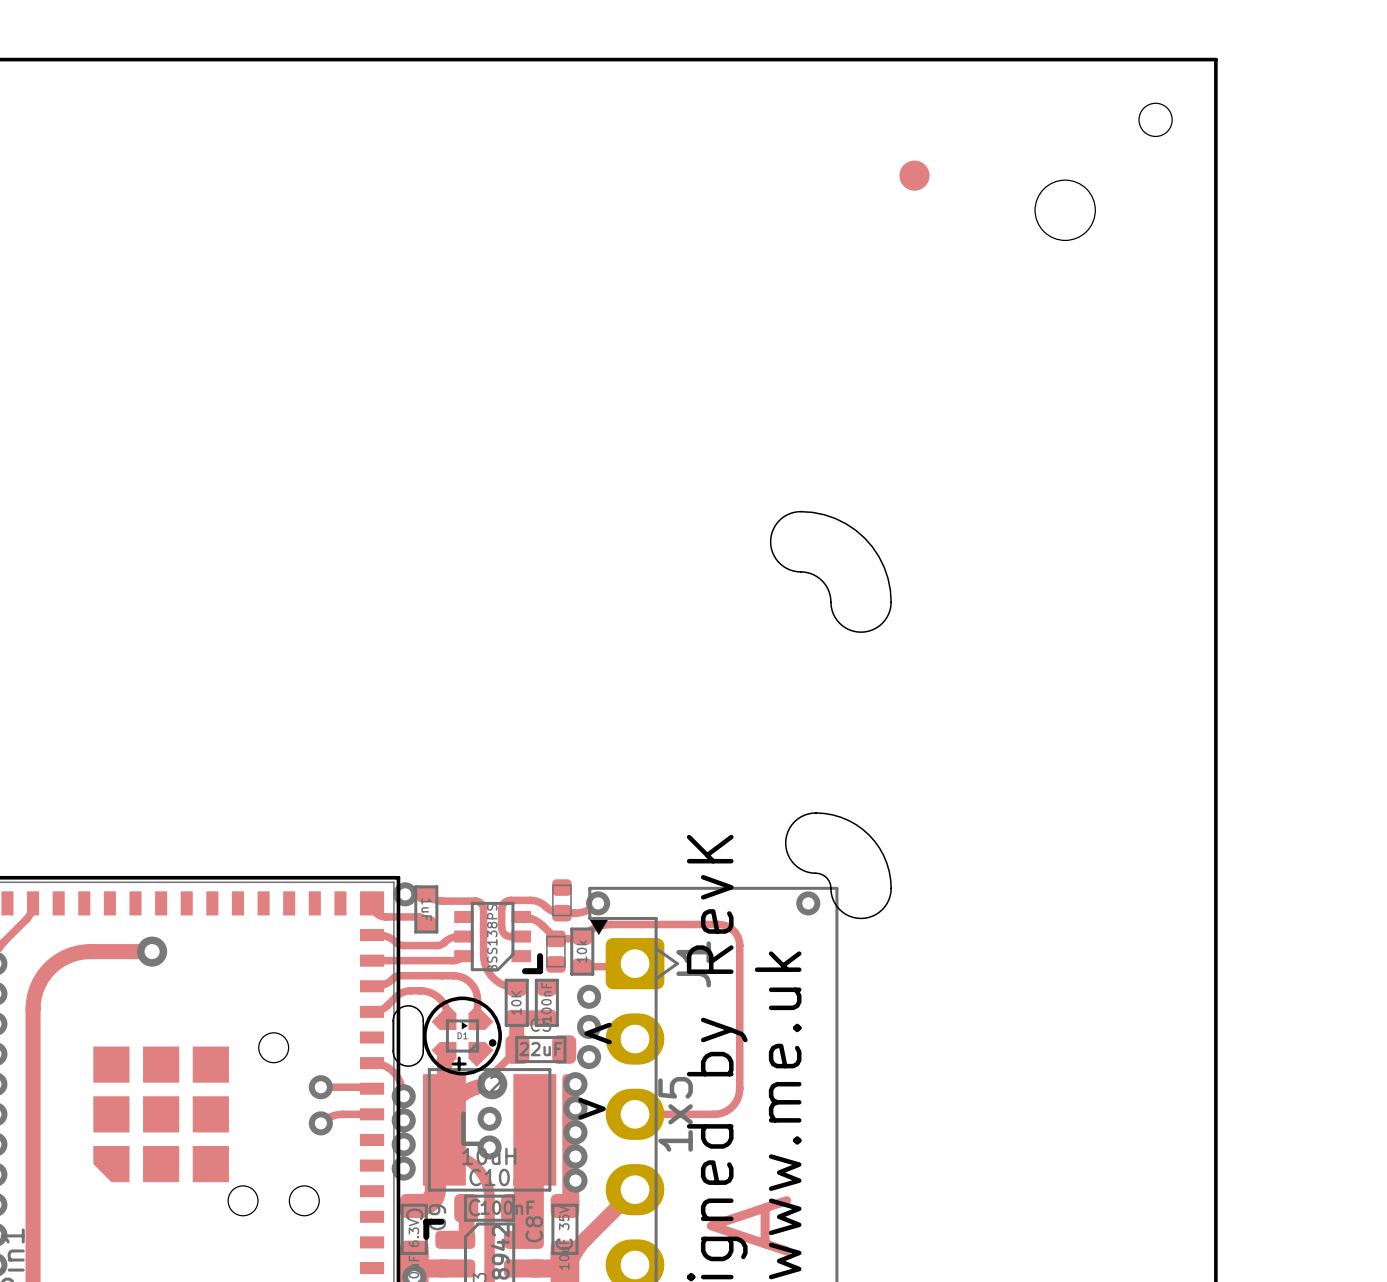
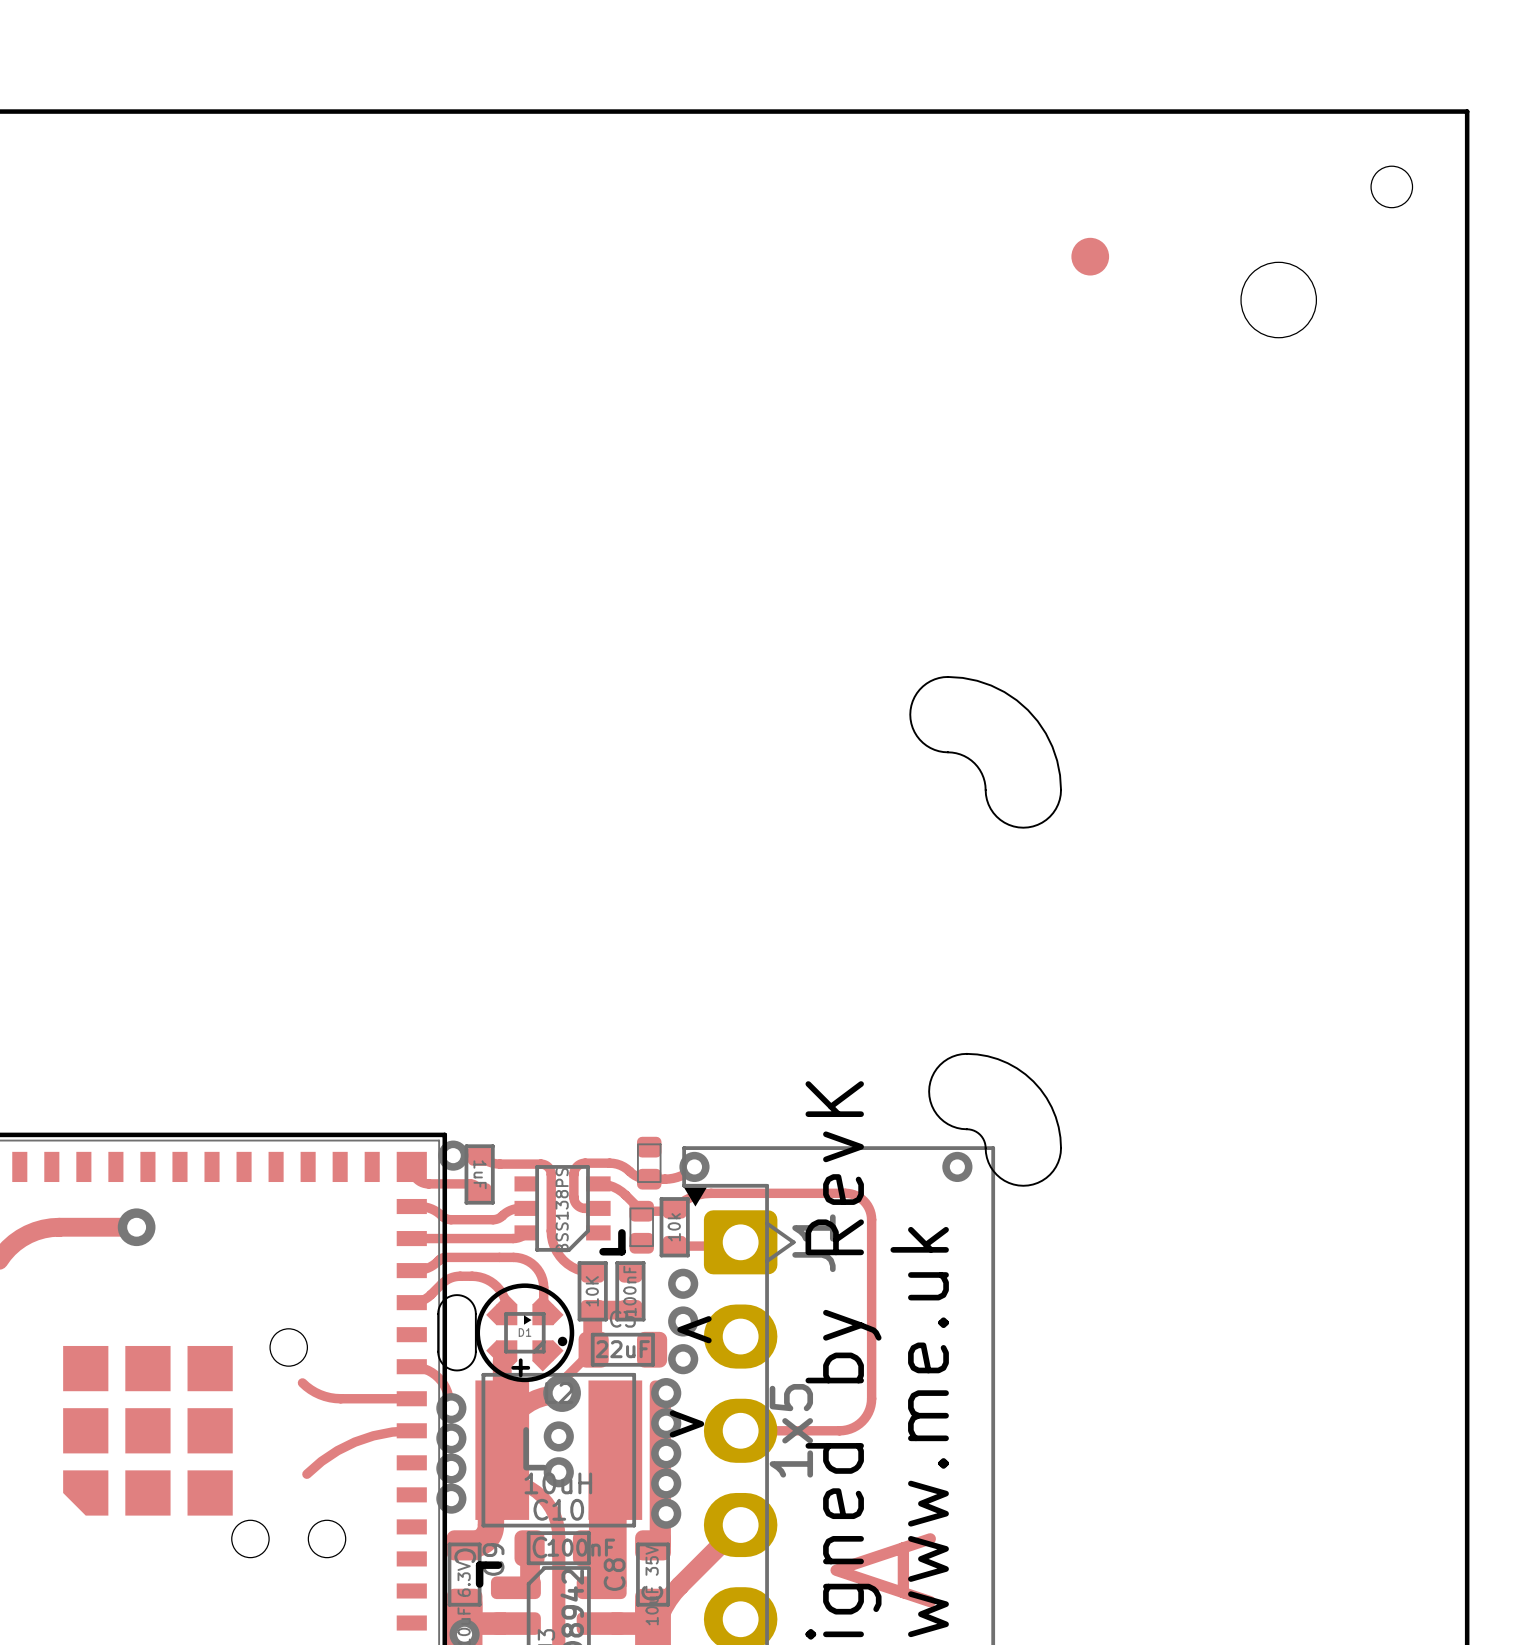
track: (320, 1087) (372, 1088) -> (302, 1382) (315, 1392) (335, 1398) (411, 1398)
via: (320, 1087) -> none
track: (372, 1114) (336, 1114) (320, 1123) -> (411, 1430) (373, 1435) (355, 1442) (321, 1461) (306, 1474)
via: (320, 1123) -> none

